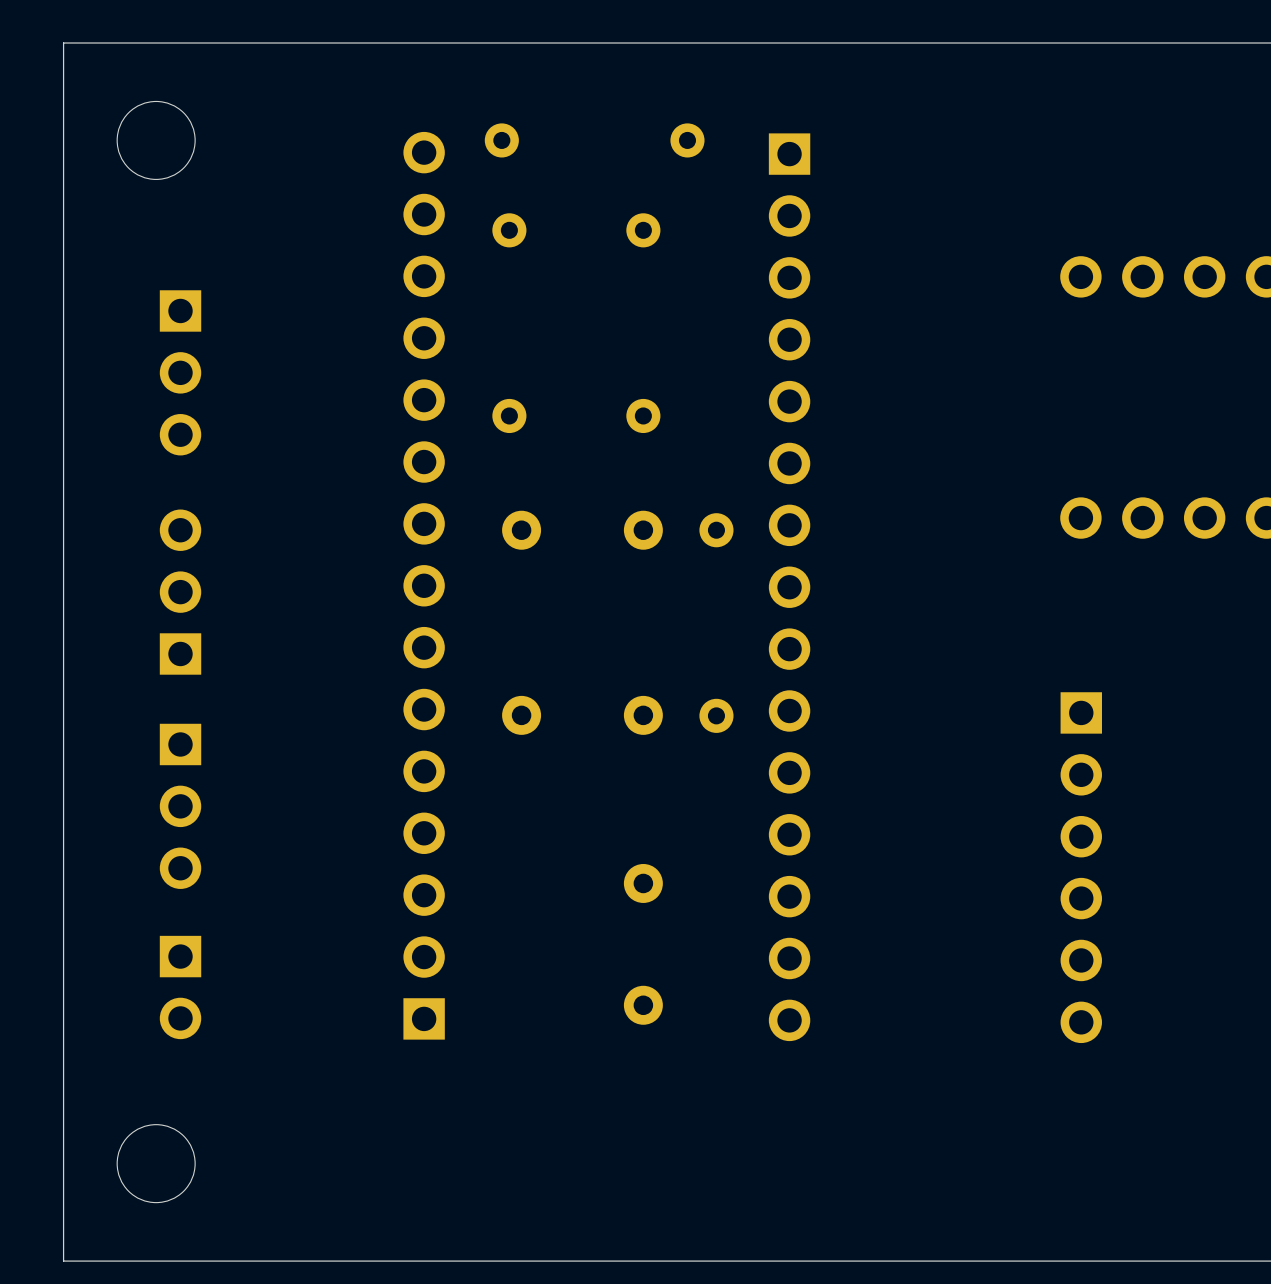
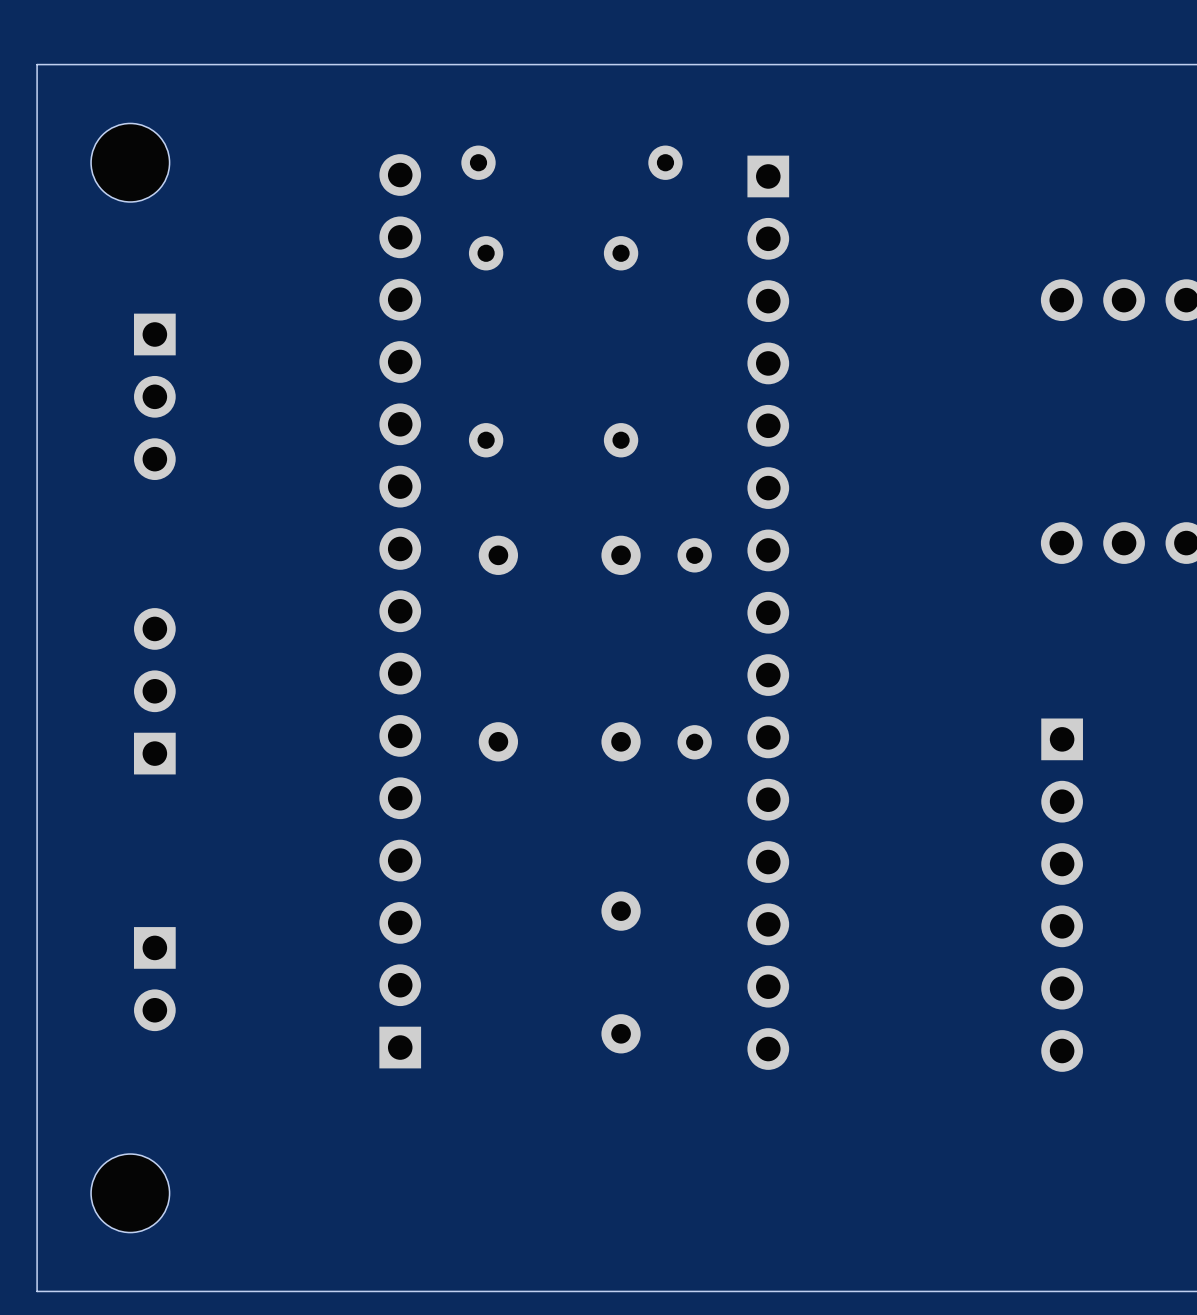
part: (180, 592) -> none
part: none -> (154, 691)
part: (180, 806) -> none
part position: (180, 987) -> (154, 979)

